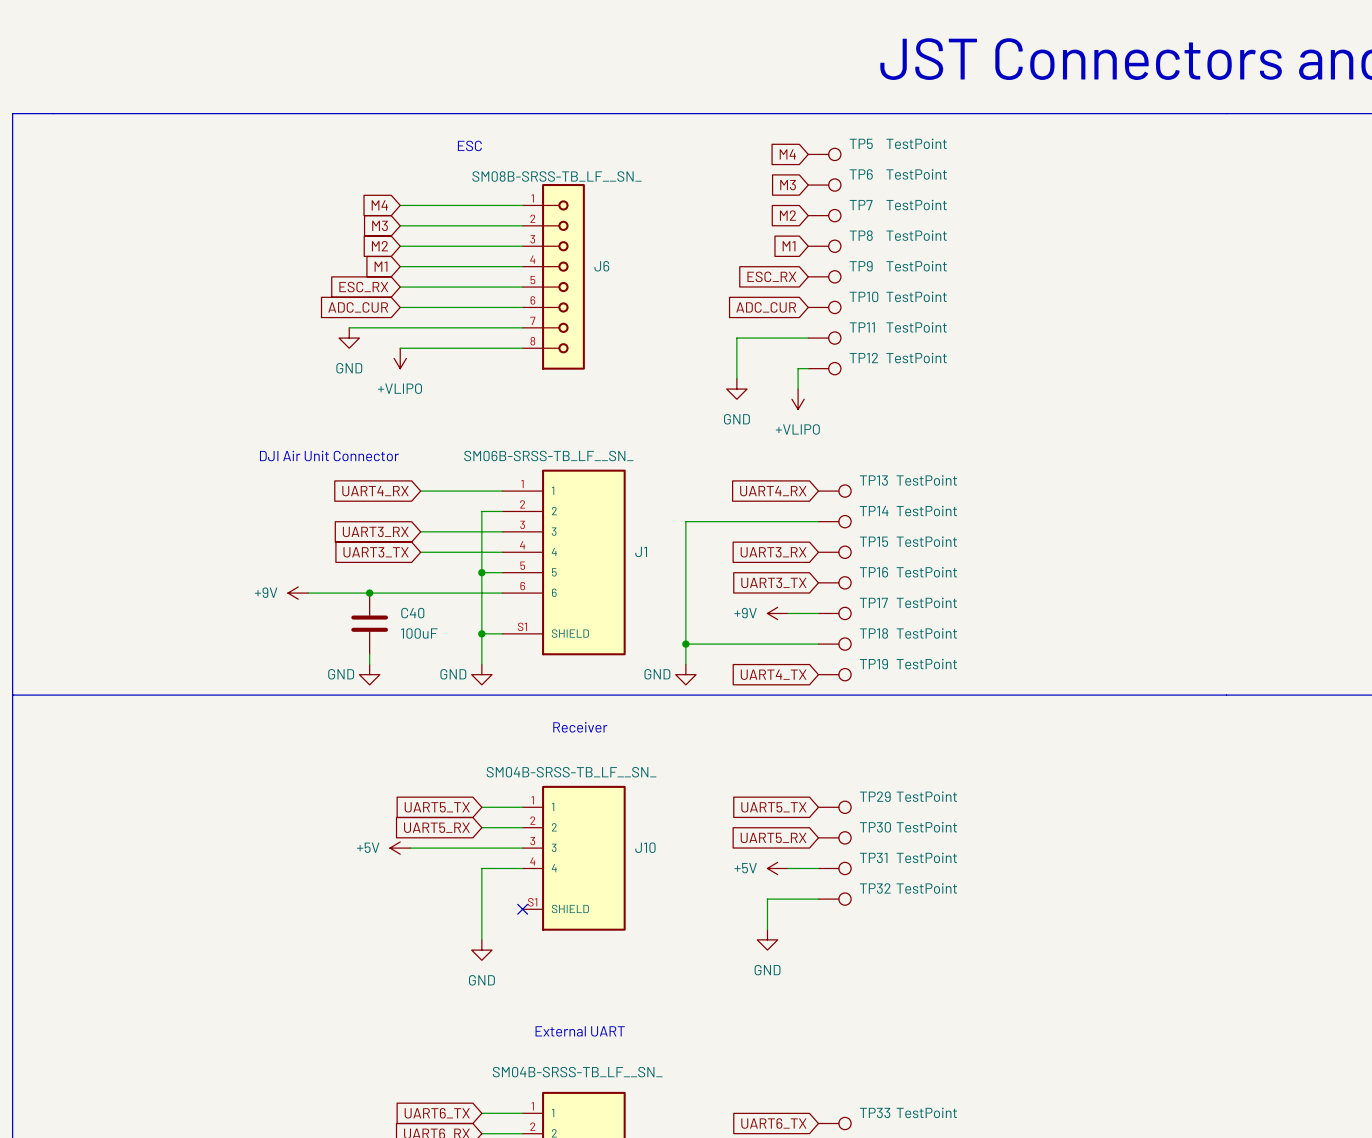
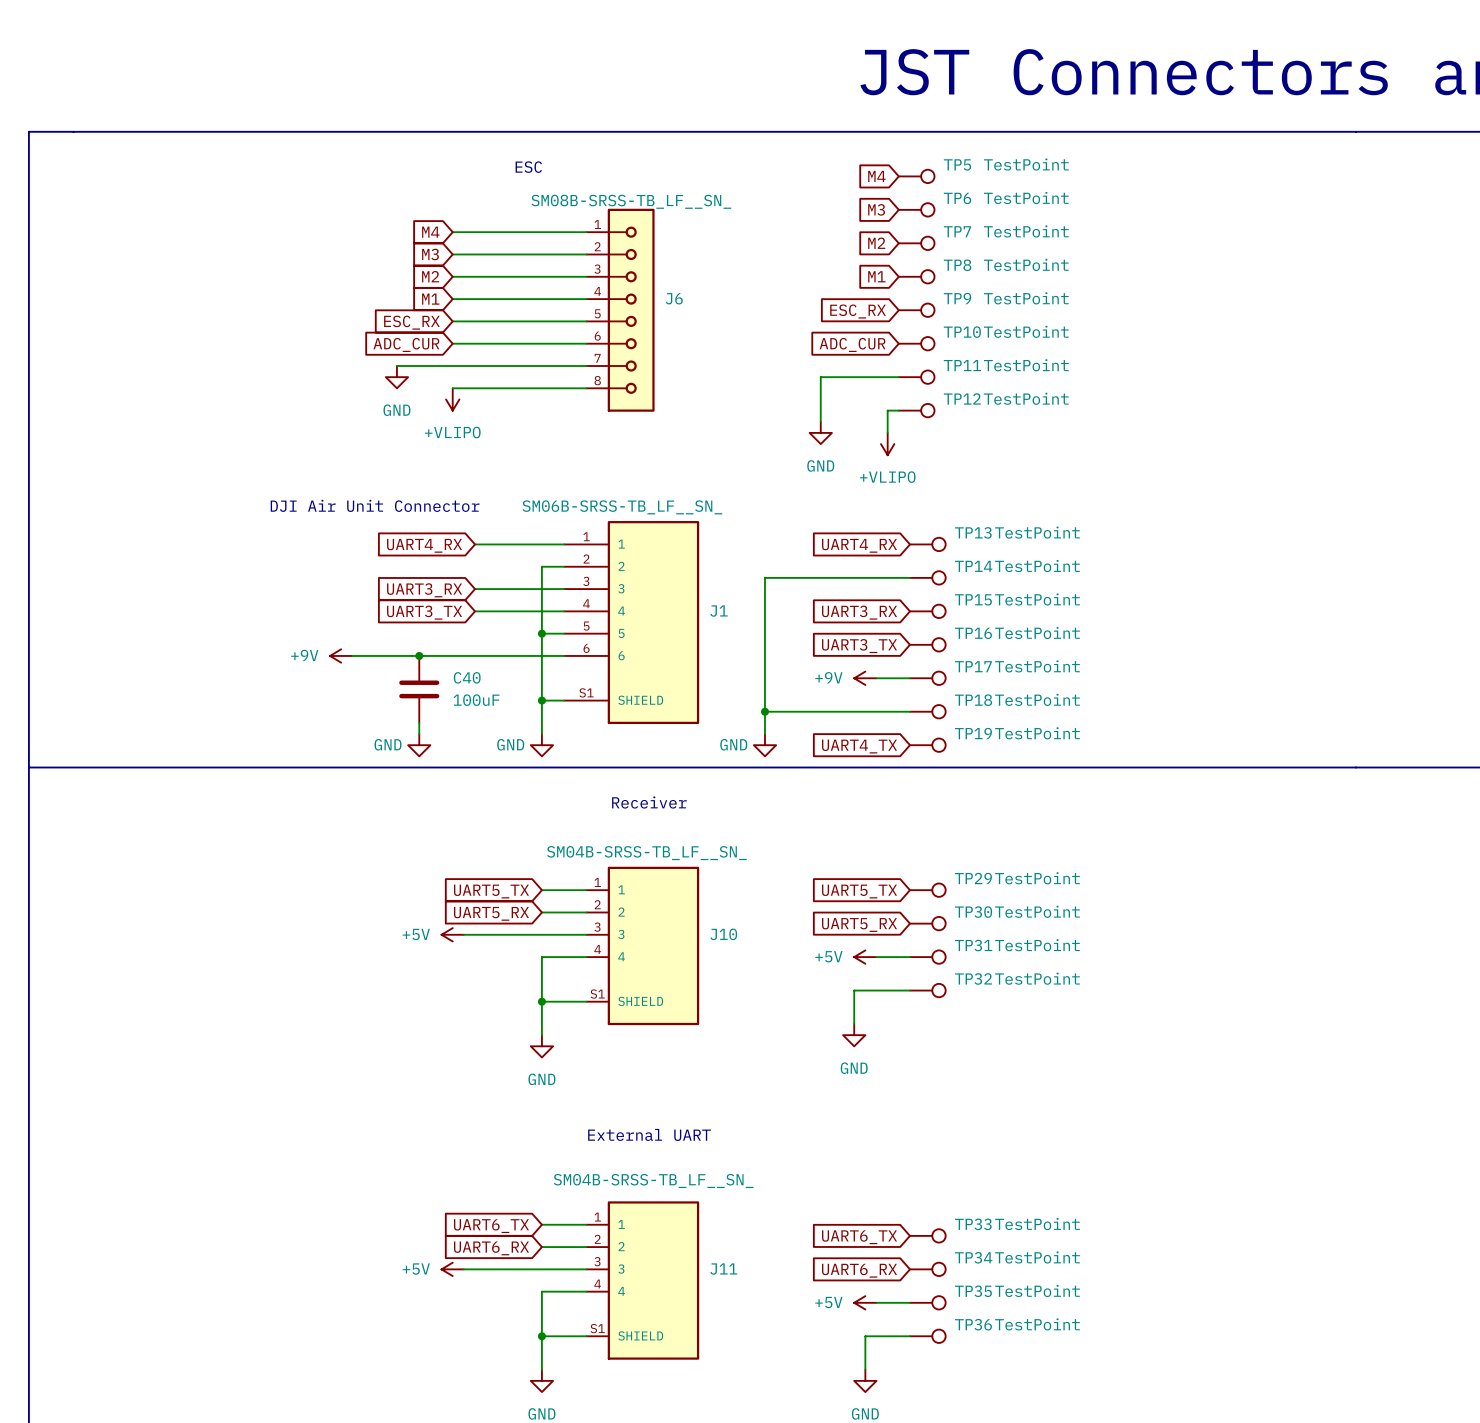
wire: none -> (541, 1001) (586, 1001)
junction: none -> (541, 1001)
no-connect mark: (522, 909) -> none

